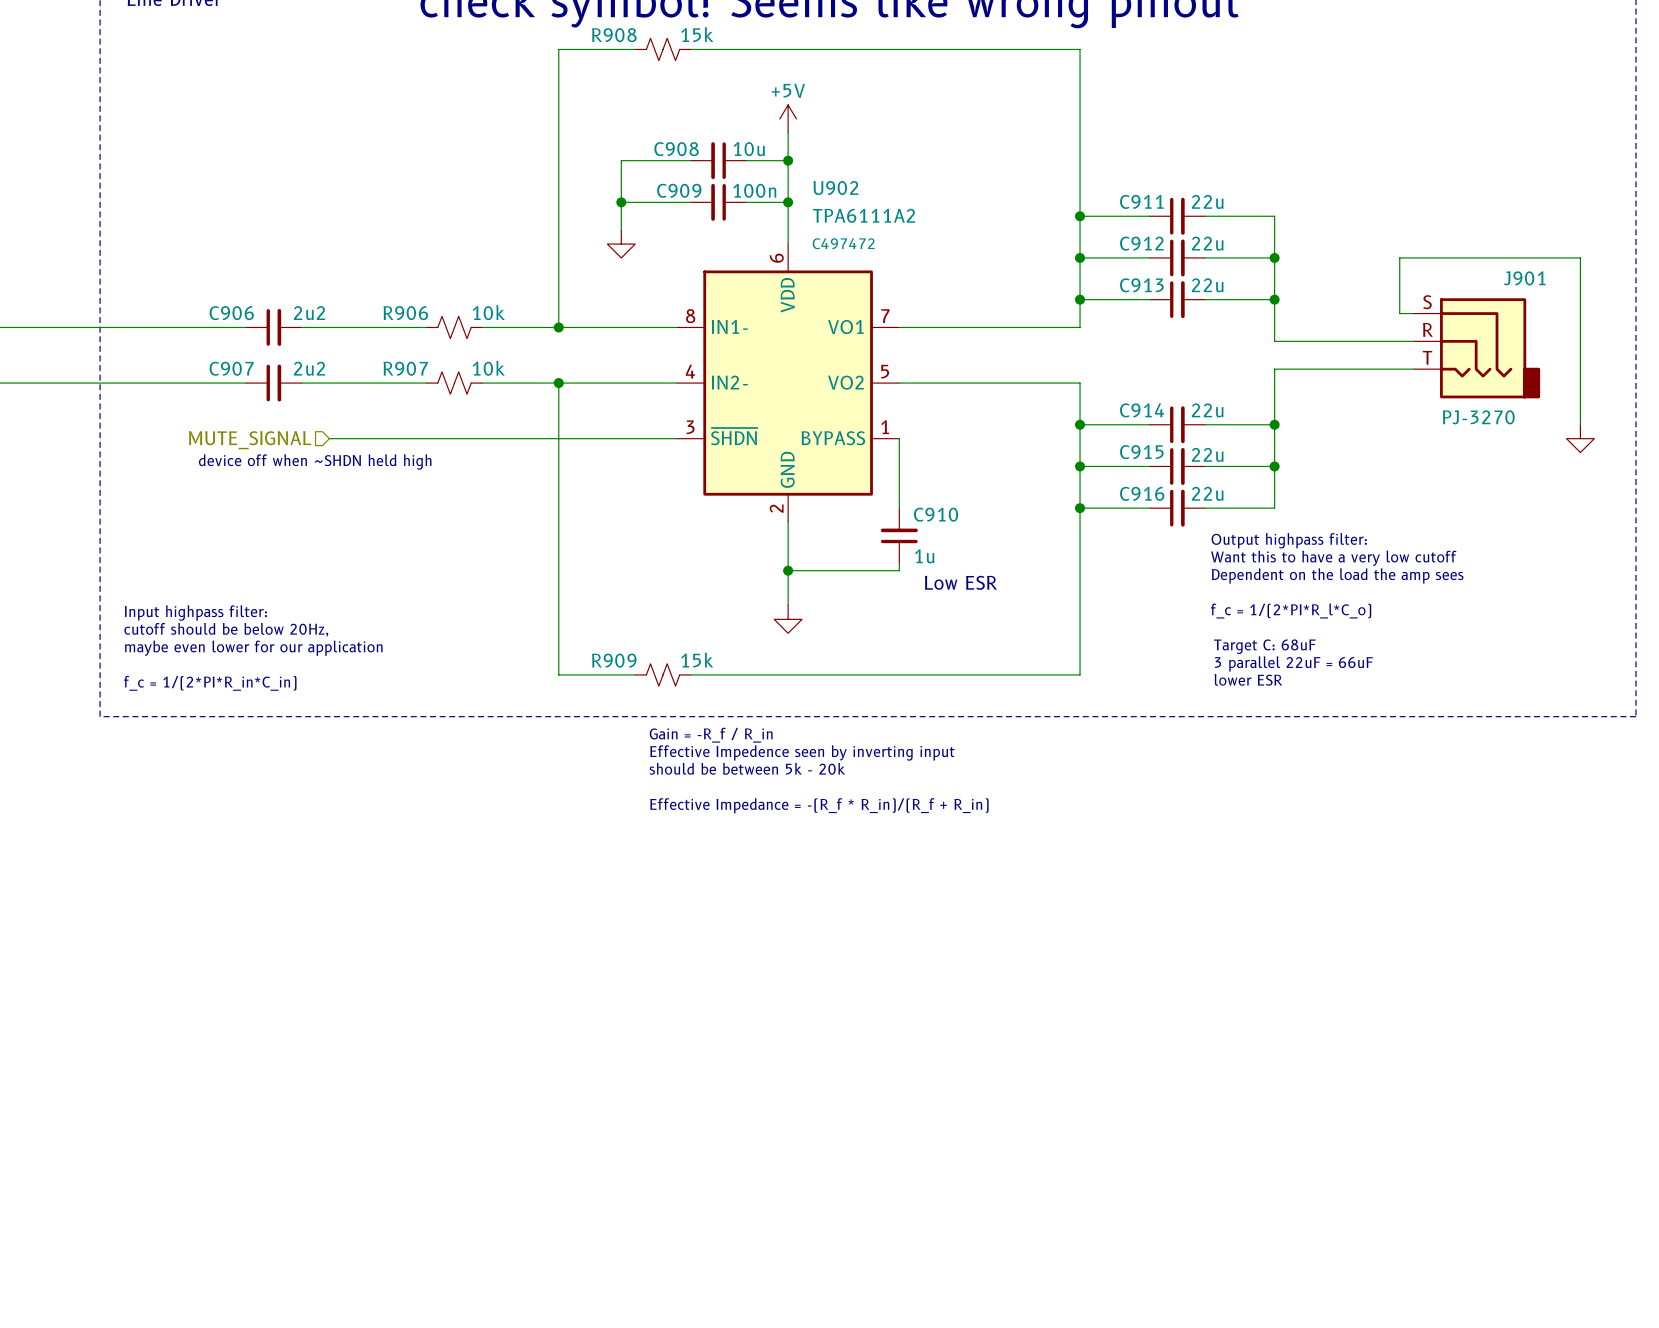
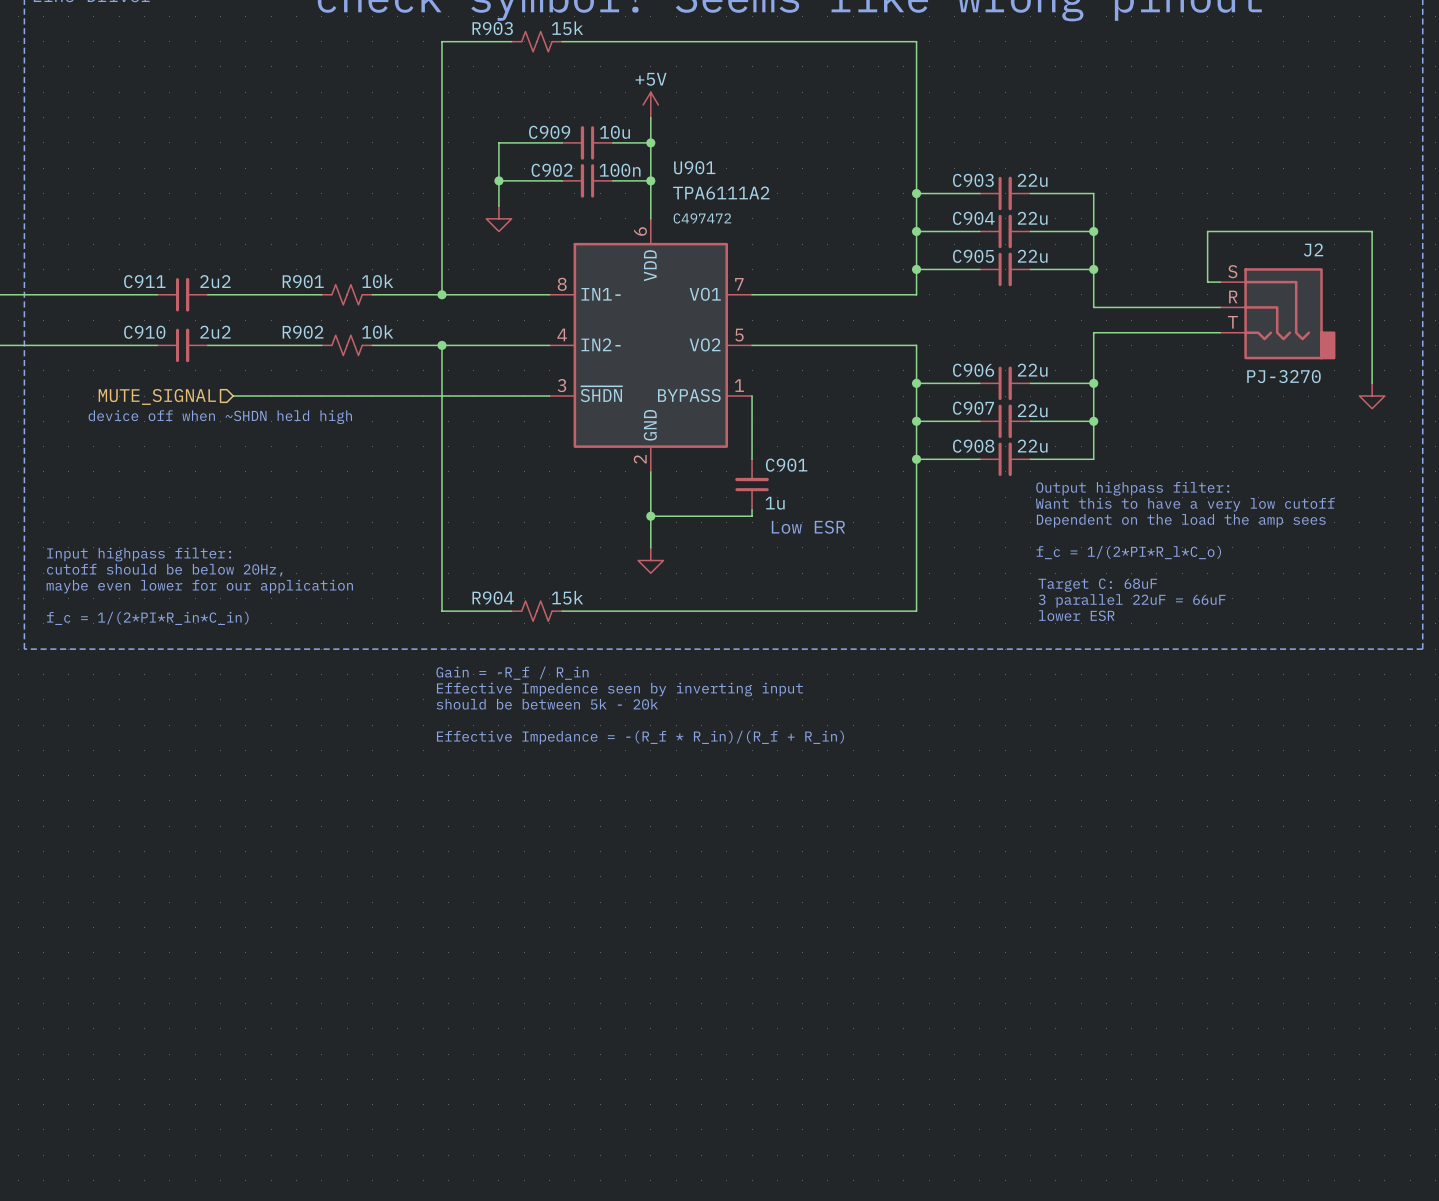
R908 name: R908 (614, 35) -> R903 (492, 28)
C908 name: C908 (676, 149) -> C909 (549, 132)
U902 name: U902 (835, 188) -> U901 (694, 167)
C909 name: C909 (679, 190) -> C902 (552, 170)
C911 name: C911 (1141, 201) -> C903 (973, 180)
C912 name: C912 (1141, 243) -> C904 (973, 218)
J901 name: J901 (1524, 278) -> J2 (1313, 250)
C913 name: C913 (1141, 285) -> C905 (973, 256)
C906 name: C906 (231, 313) -> C911 (144, 281)
R906 name: R906 (405, 313) -> R901 (303, 281)
C907 name: C907 (231, 368) -> C910 (144, 332)
R907 name: R907 (405, 368) -> R902 (303, 332)
C914 name: C914 (1142, 410) -> C906 (973, 370)
C915 name: C915 (1141, 452) -> C907 (973, 408)
C916 name: C916 (1142, 493) -> C908 (973, 446)
C910 name: C910 (936, 514) -> C901 (786, 465)
R909 name: R909 (614, 660) -> R904 (493, 598)
text position: Gain = -R_f / R_in (711, 735) -> Gain = -R_f / R_in (512, 673)
text position: Effective Impedence seen by inverting input (802, 752) -> Effective Impedence seen by inverting input (619, 689)
text position: should be between 5k - 20k (747, 768) -> should be between 5k - 20k (547, 704)
text position: Effective Impedance = -(R_f * R_in)/(R_f + R_in) (819, 805) -> Effective Impedance = -(R_f * R_in)/(R_f + R_in) (640, 737)

